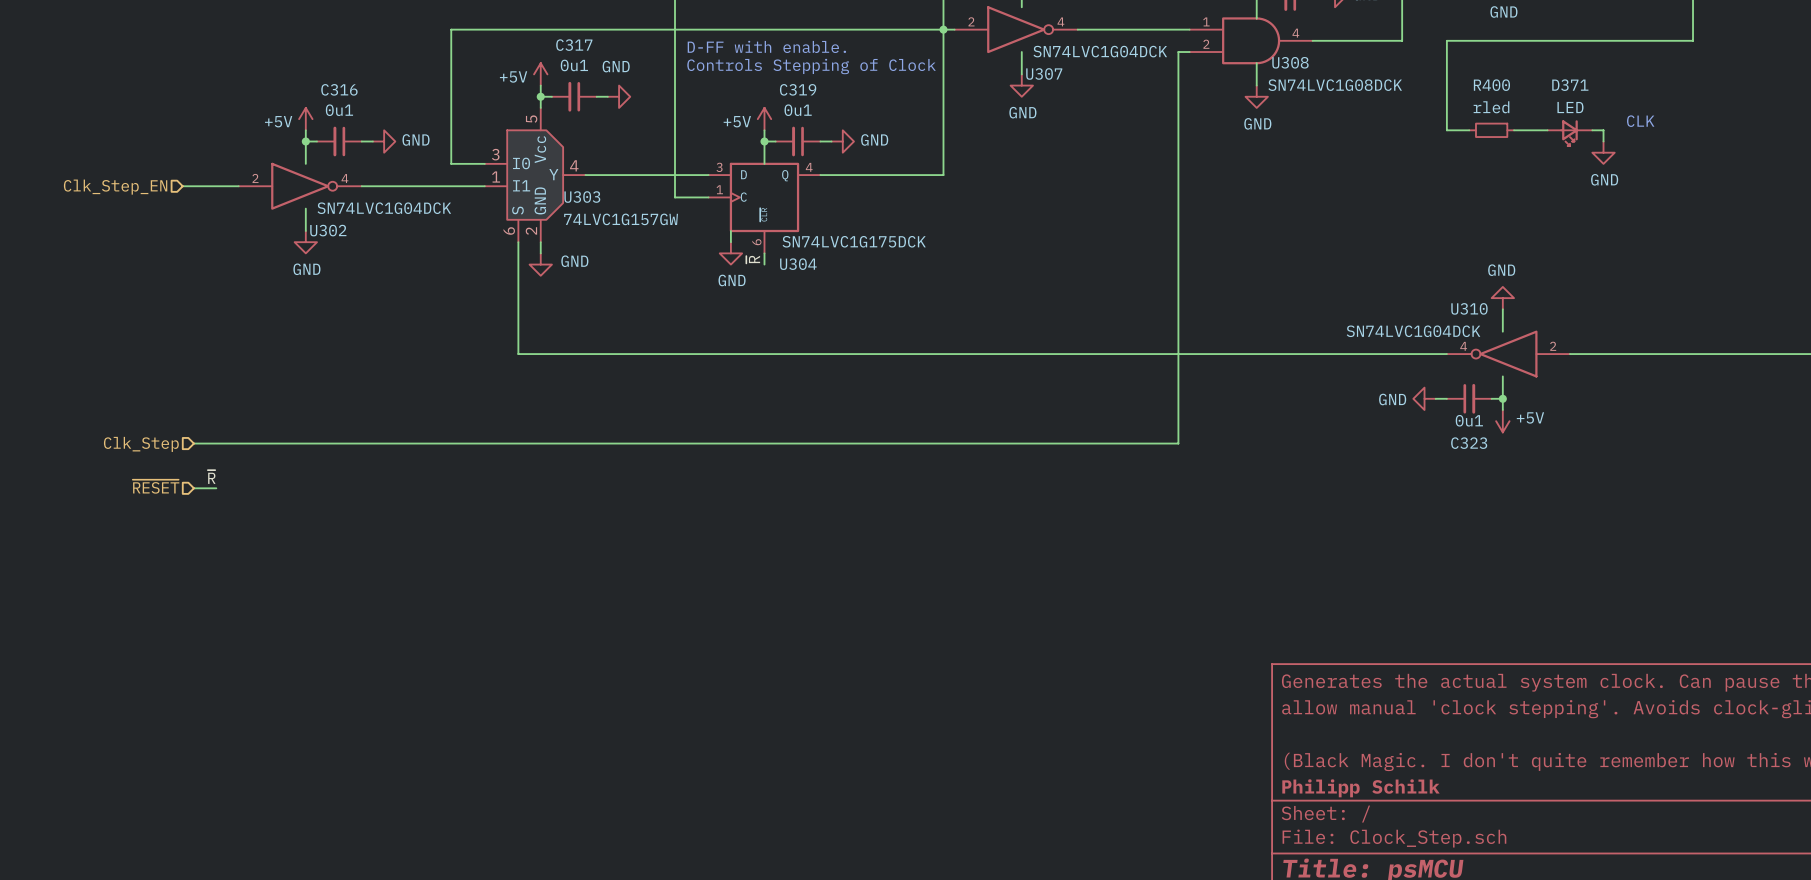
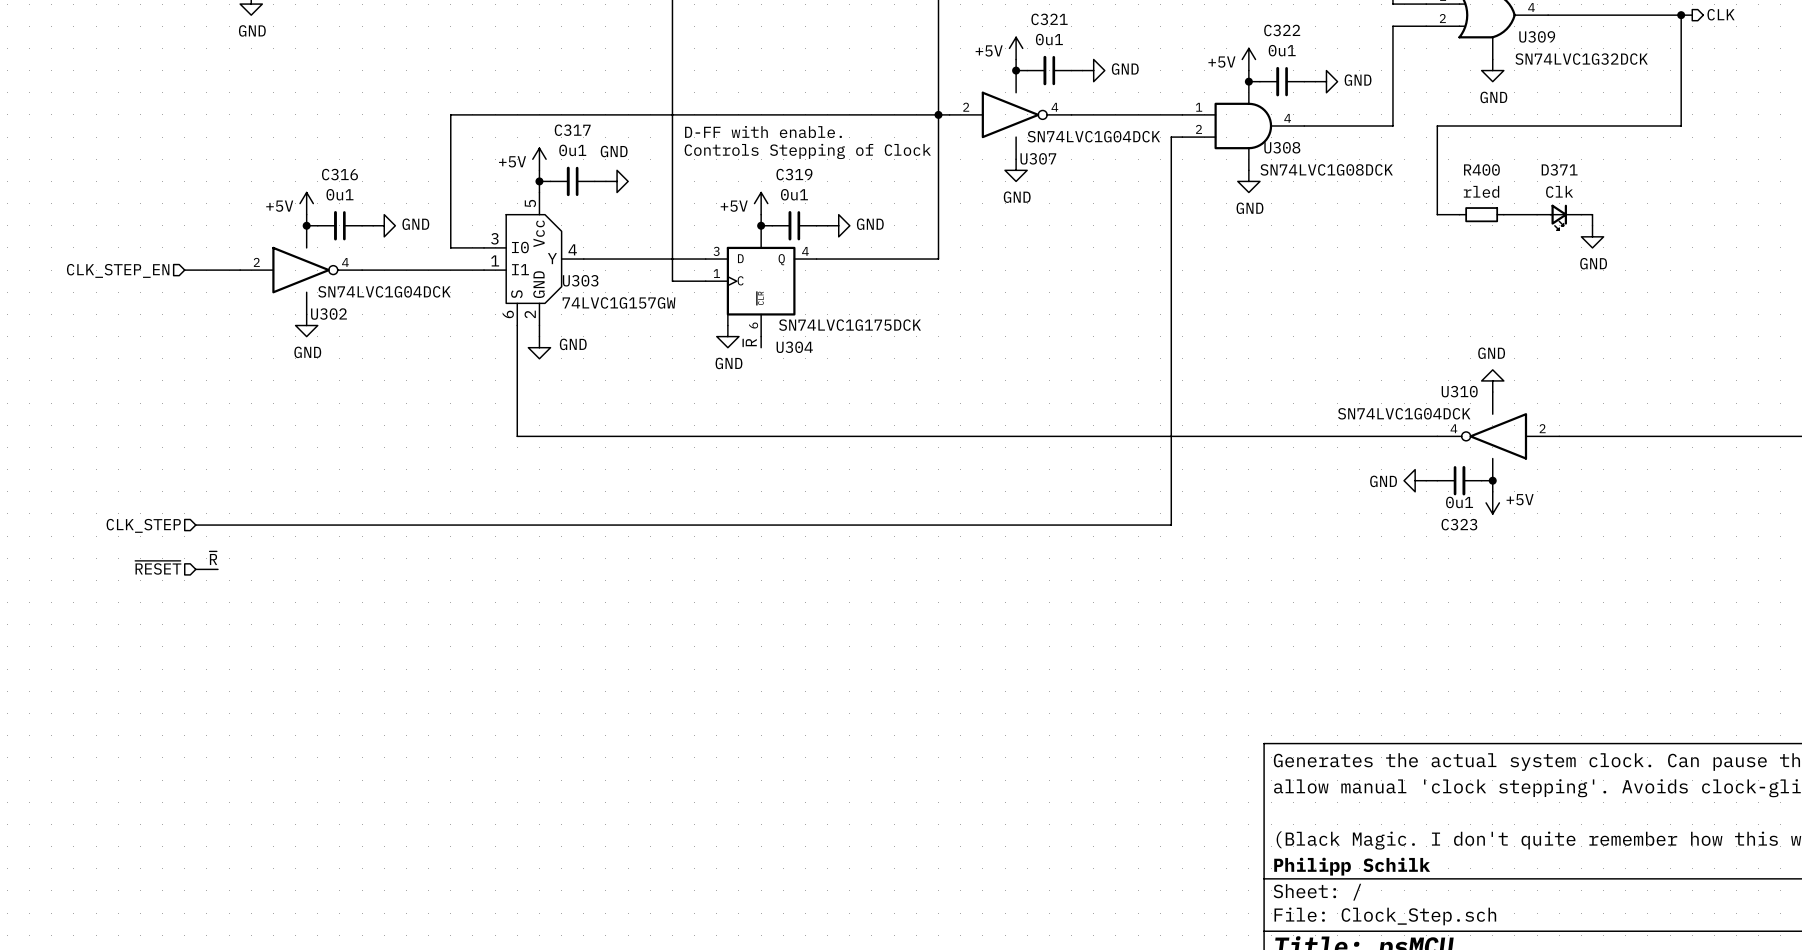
D371 value: LED (1570, 107) -> Clk (1559, 191)
text: CLK (1640, 121) -> none
hierarchical label: Clk_Step_EN (115, 187) -> CLK_STEP_EN (118, 270)
hierarchical label: Clk_Step (141, 444) -> CLK_STEP (143, 525)

